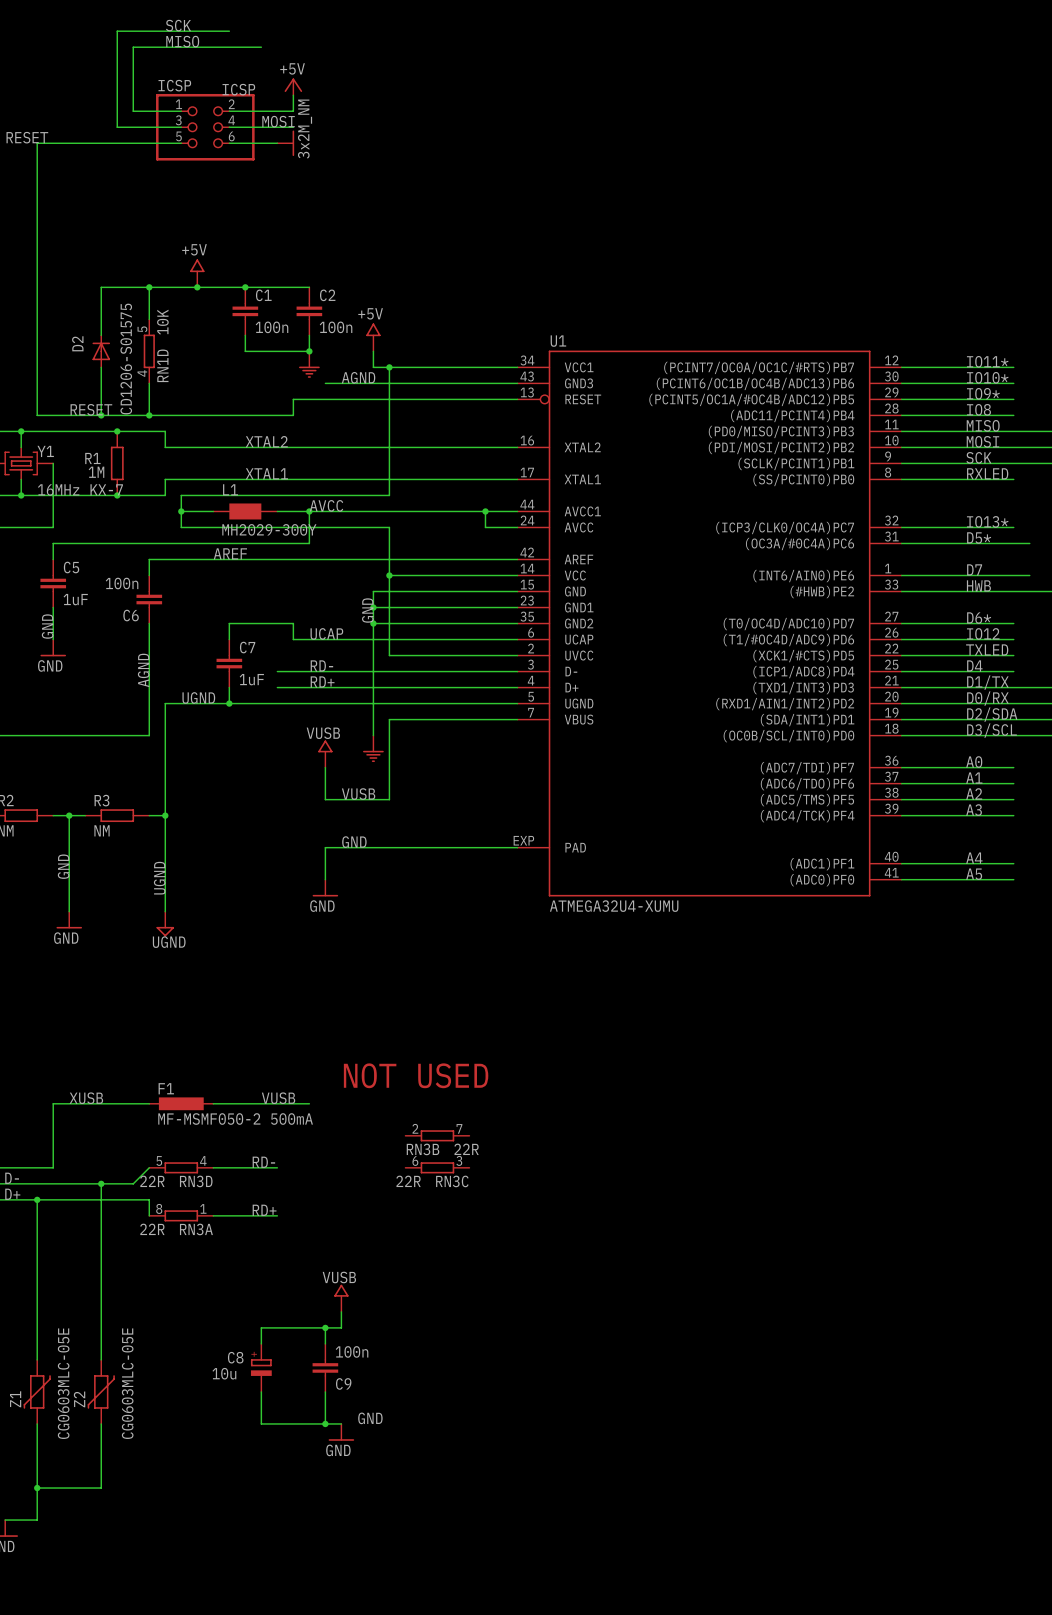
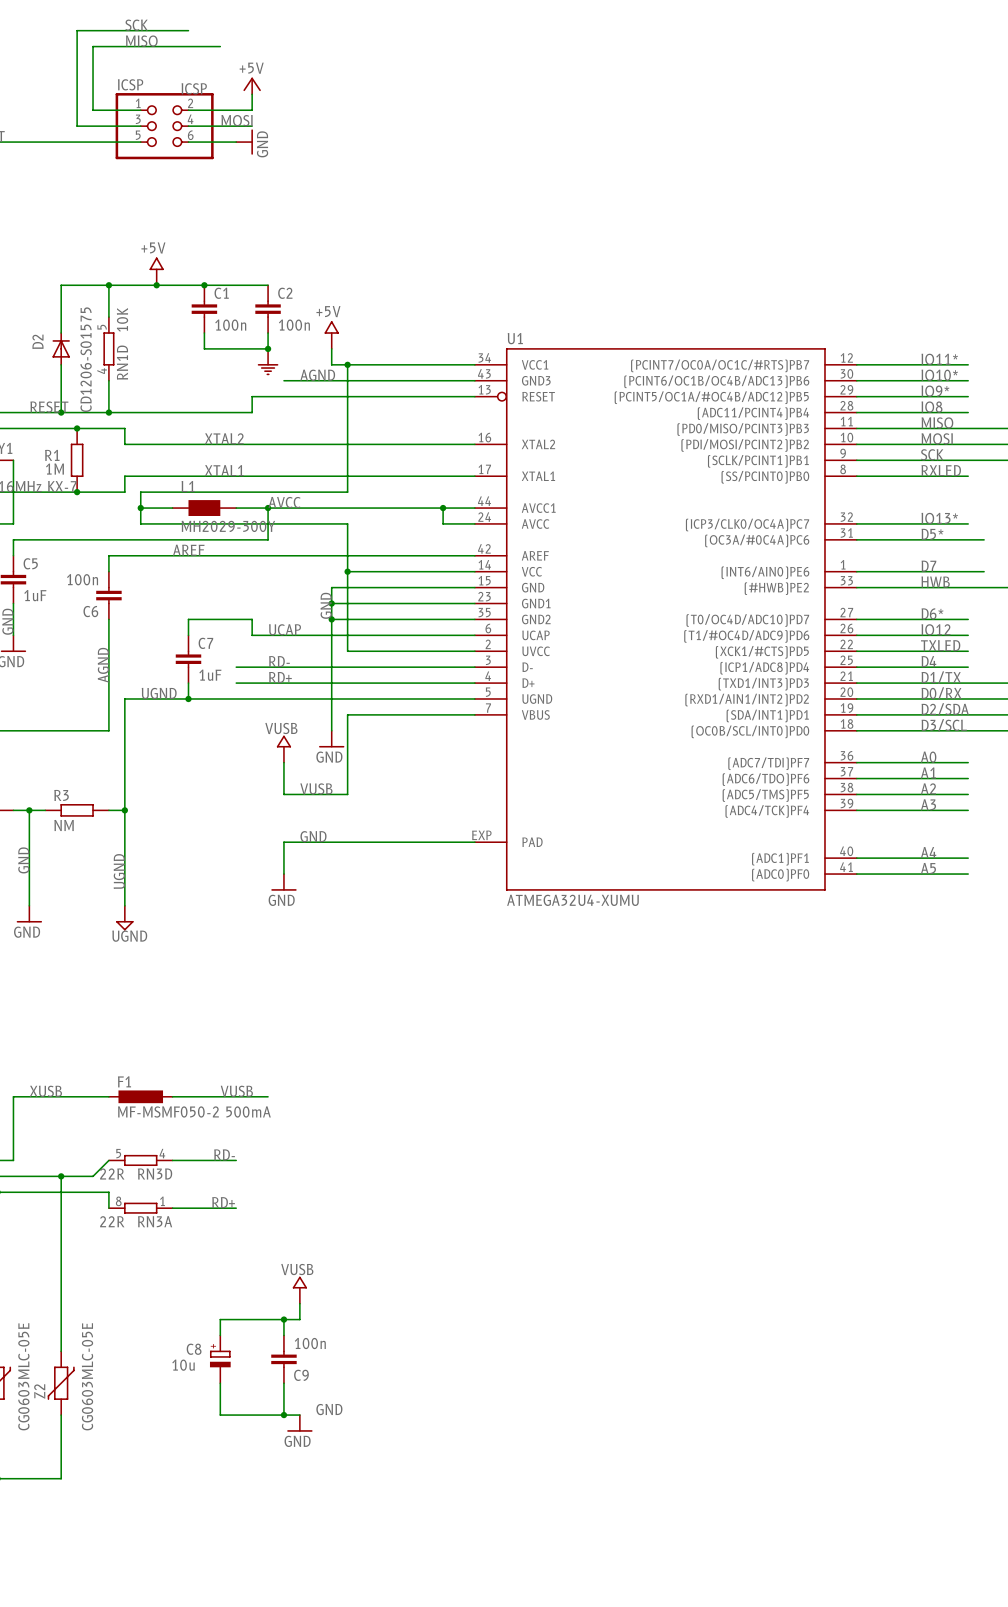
power symbol: 3x2M_NM (285, 143) -> GND (244, 142)
power symbol shape: [363, 735, 384, 763] -> [318, 730, 345, 748]
power symbol text: none -> GND (329, 757)
text: NOT USED (416, 1075) -> none
RN3B: 22R (437, 1135) -> none
RN3C: 22R (437, 1167) -> none

